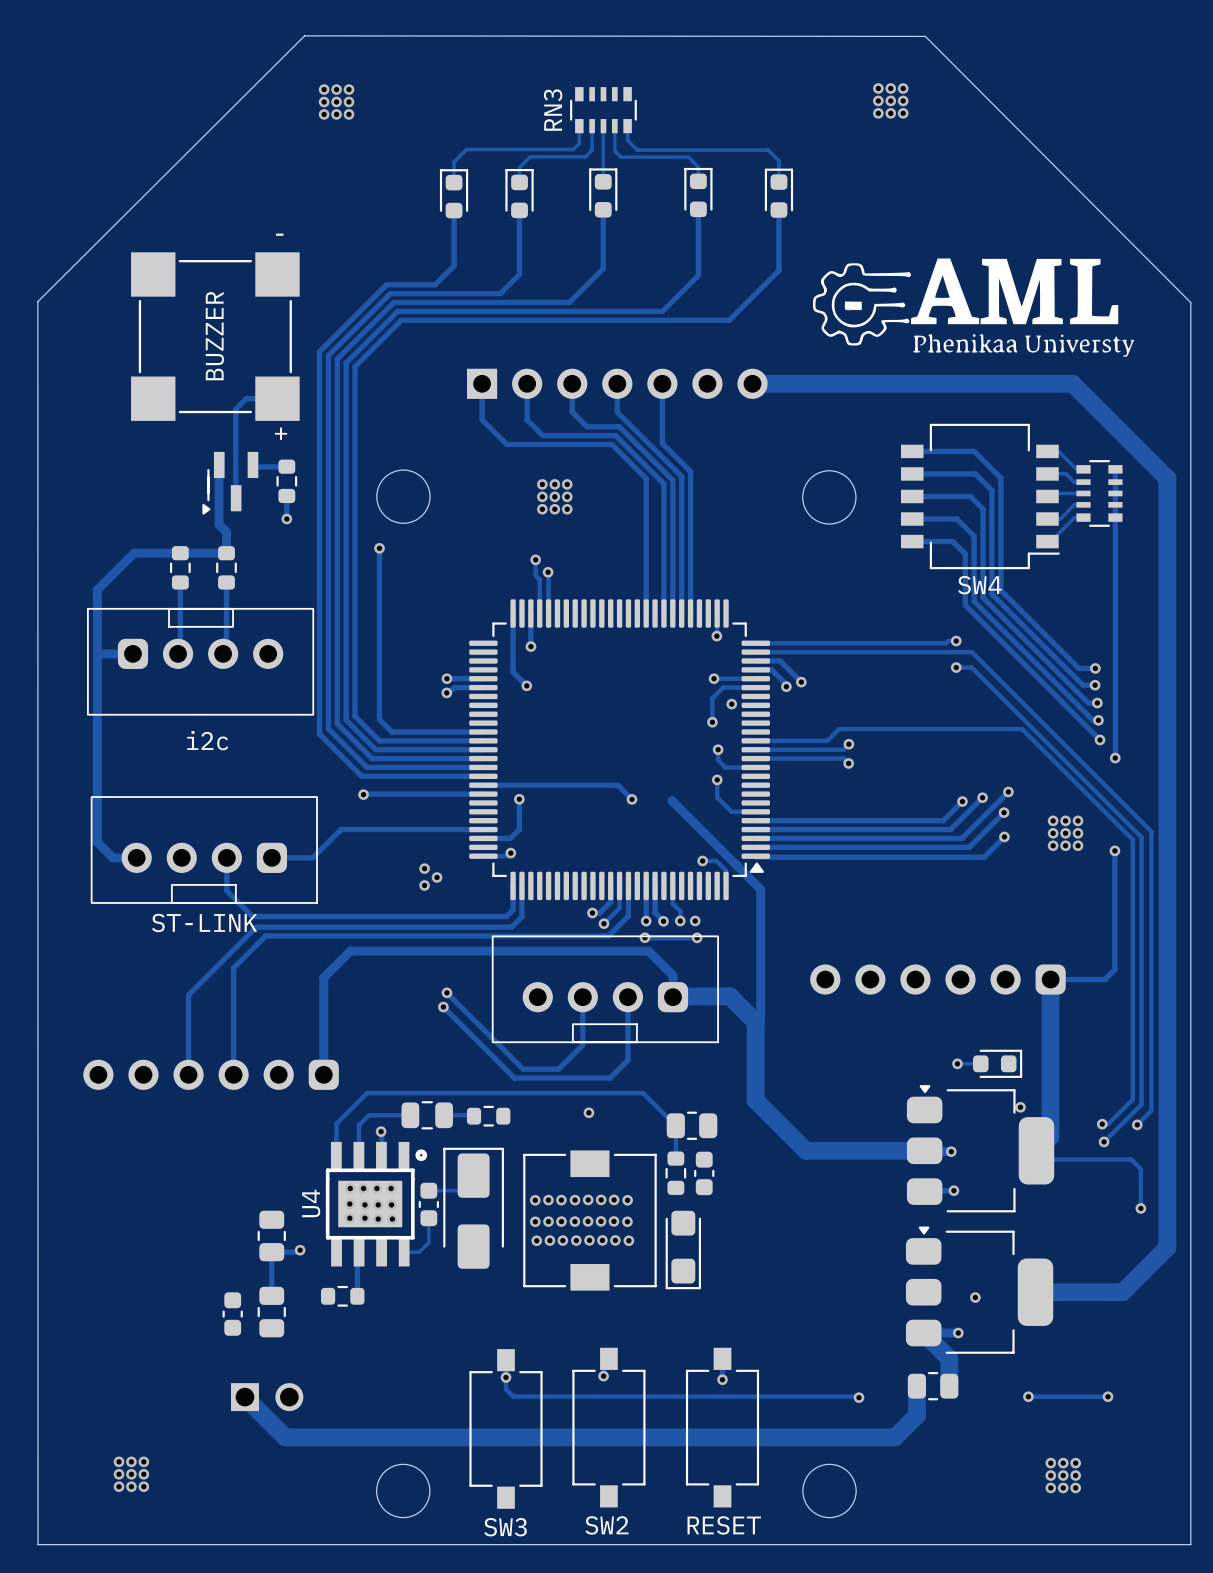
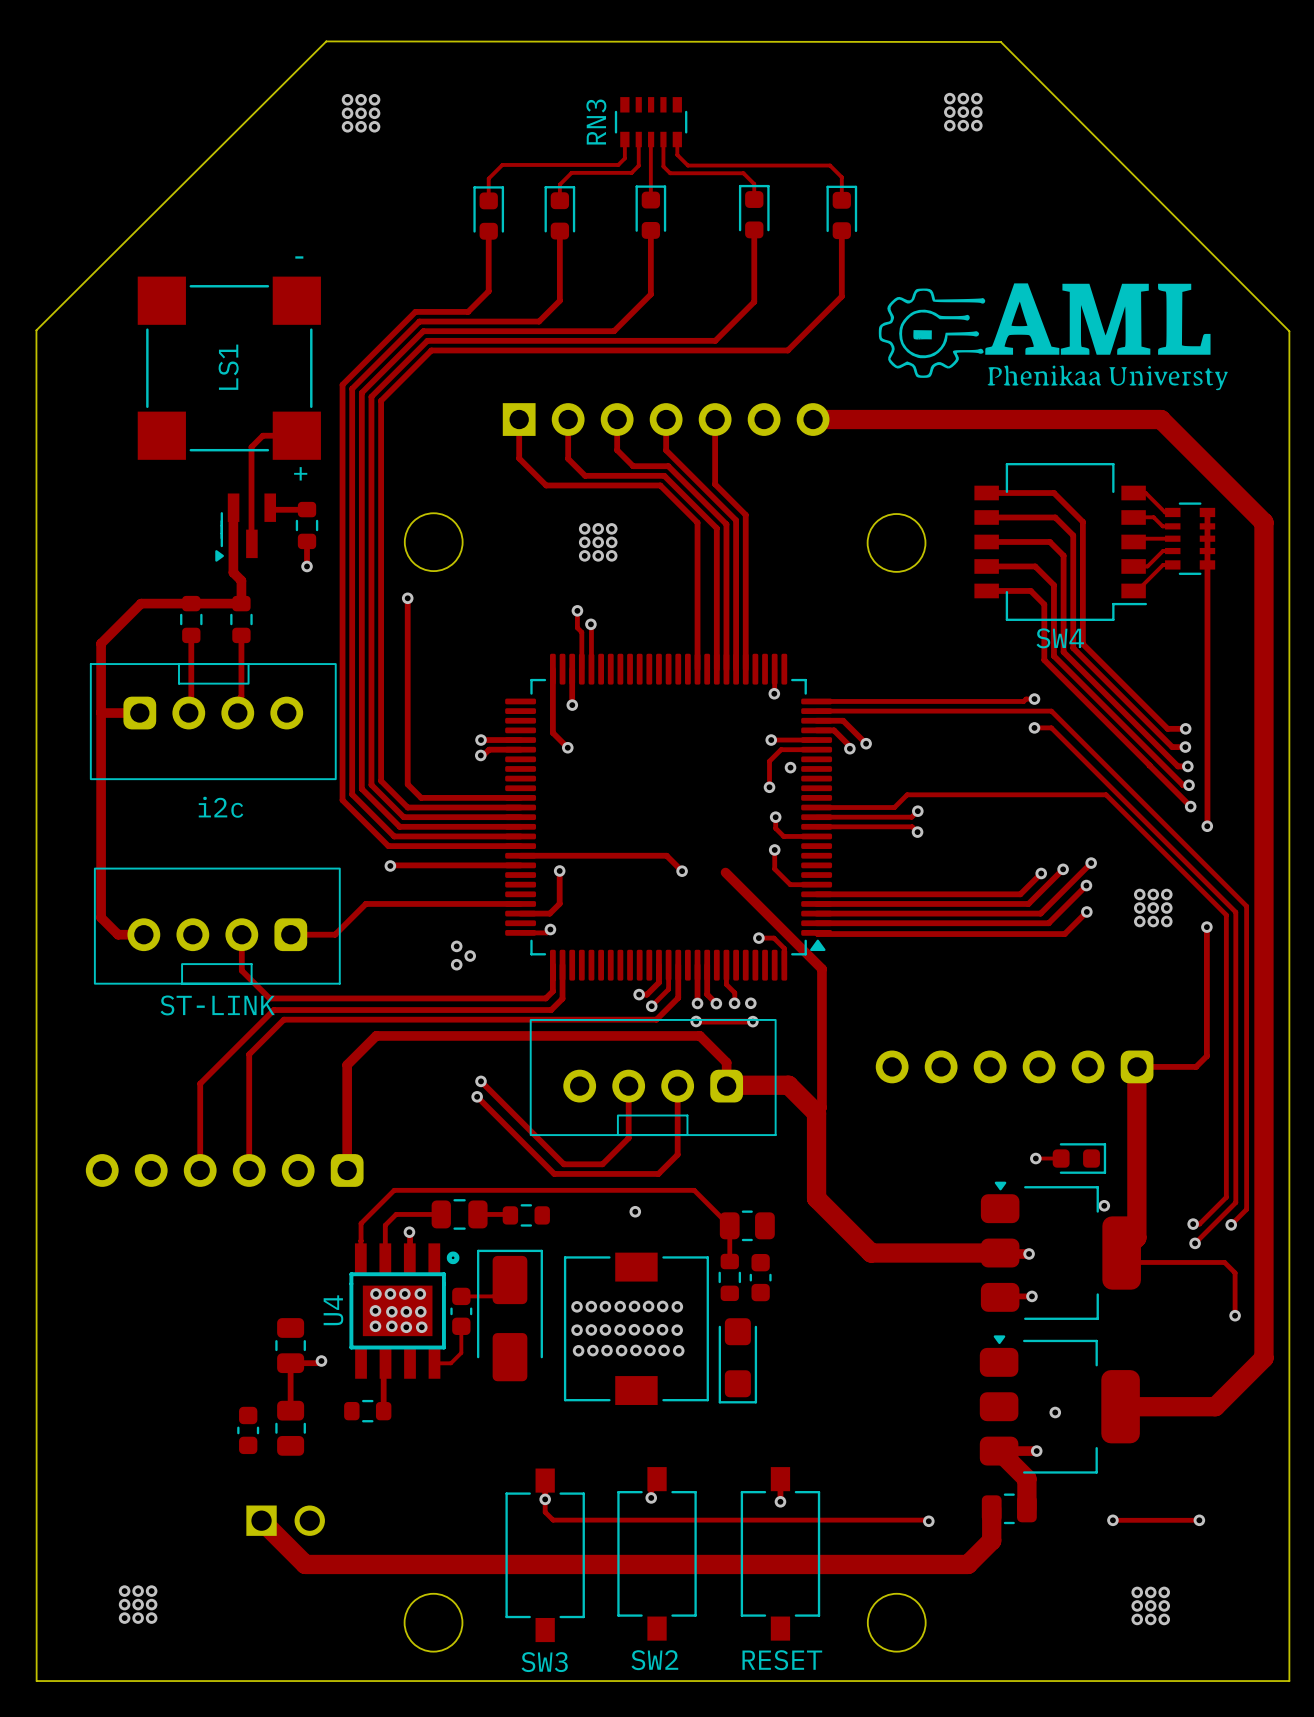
BUZZER name: BUZZER (214, 336) -> LS1 (228, 367)

